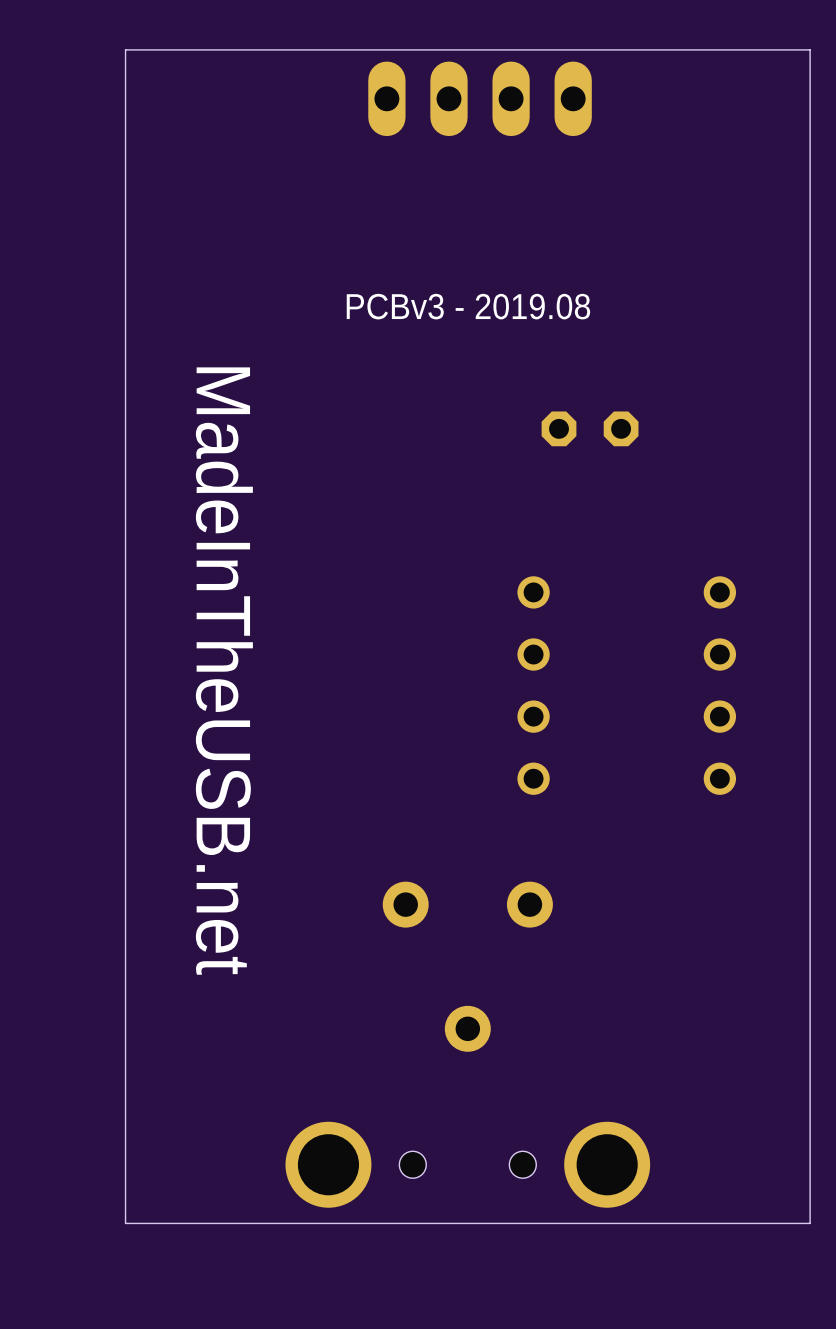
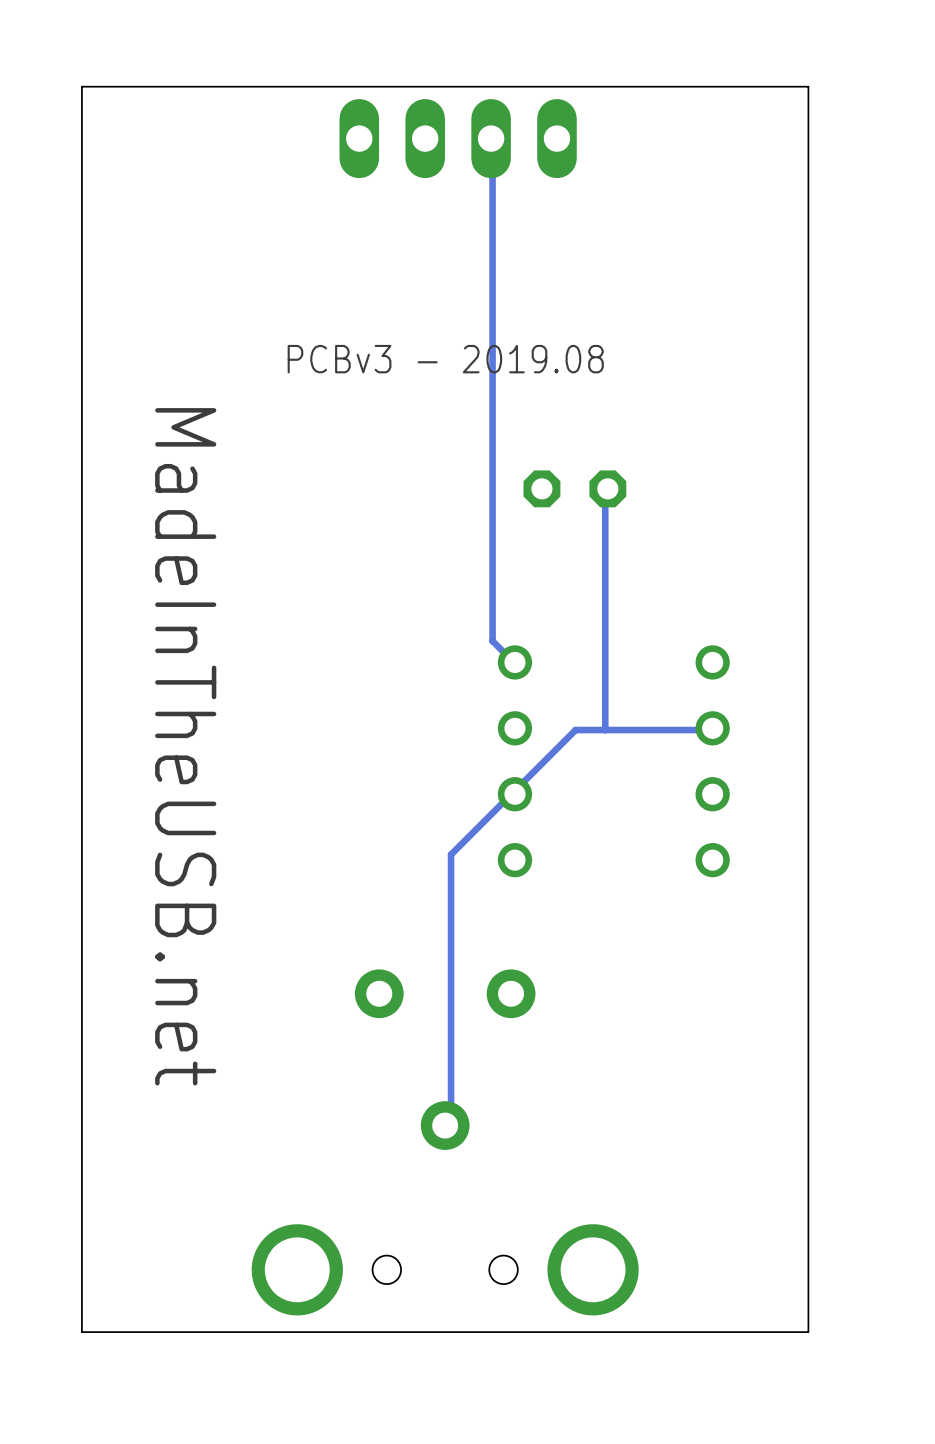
track: none -> (491, 138) (492, 641) (514, 662)
track: none -> (607, 488) (605, 492) (605, 730)
track: none -> (712, 728) (712, 730) (575, 730) (516, 789) (514, 794) (510, 795) (451, 854) (451, 1121) (445, 1125)

